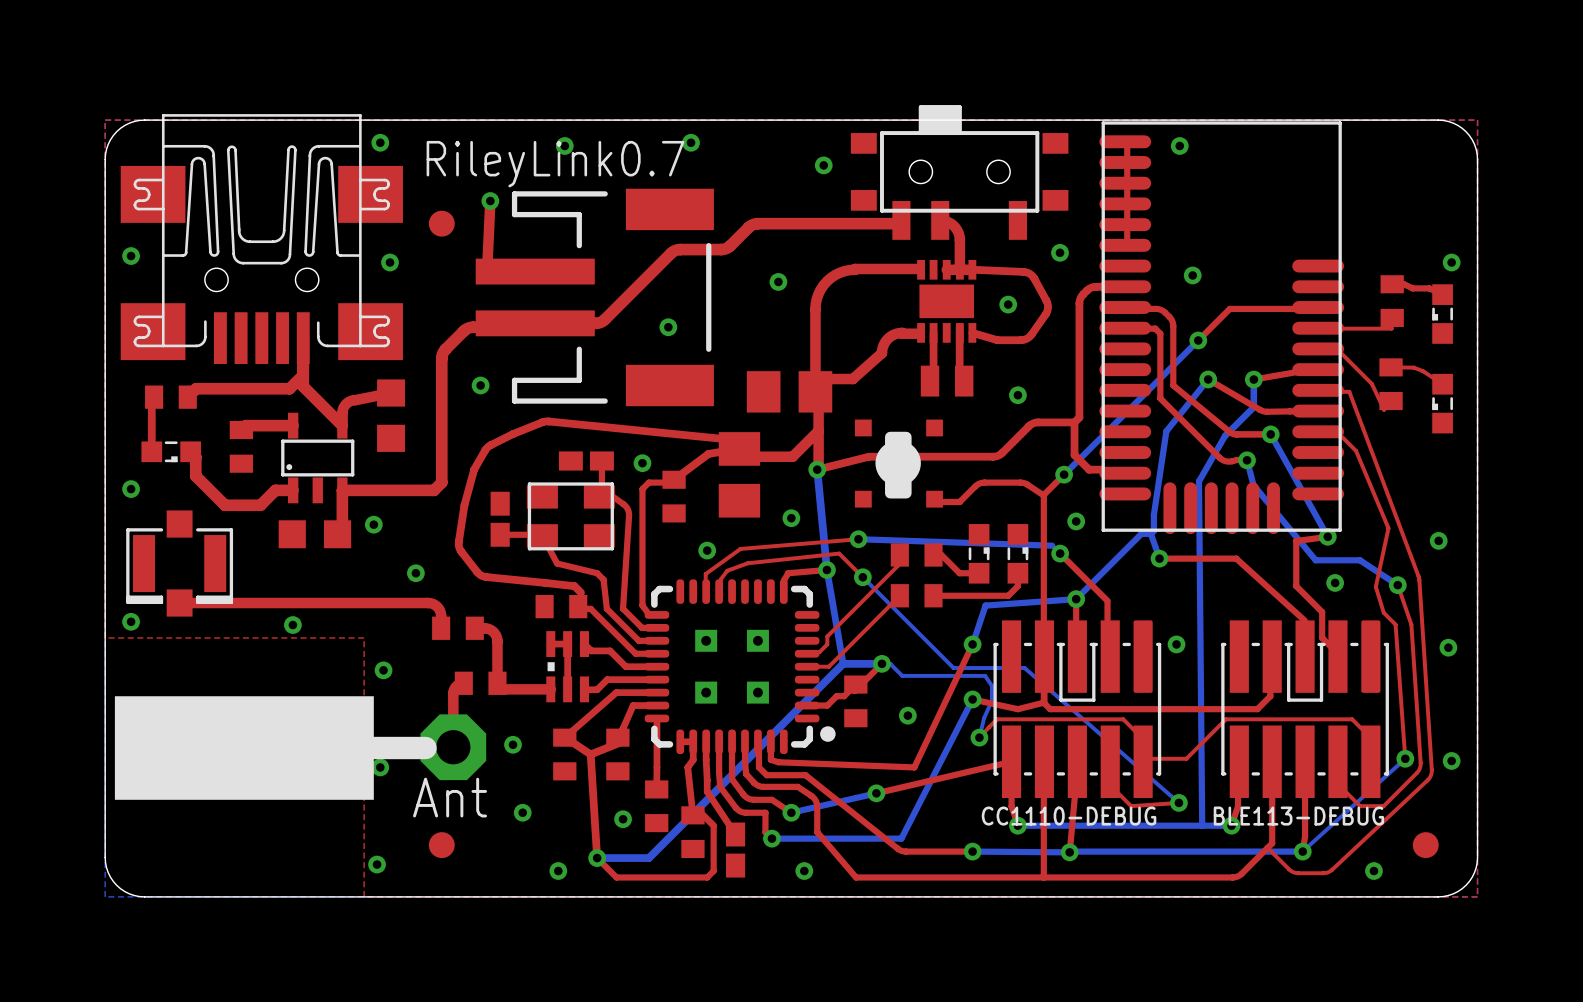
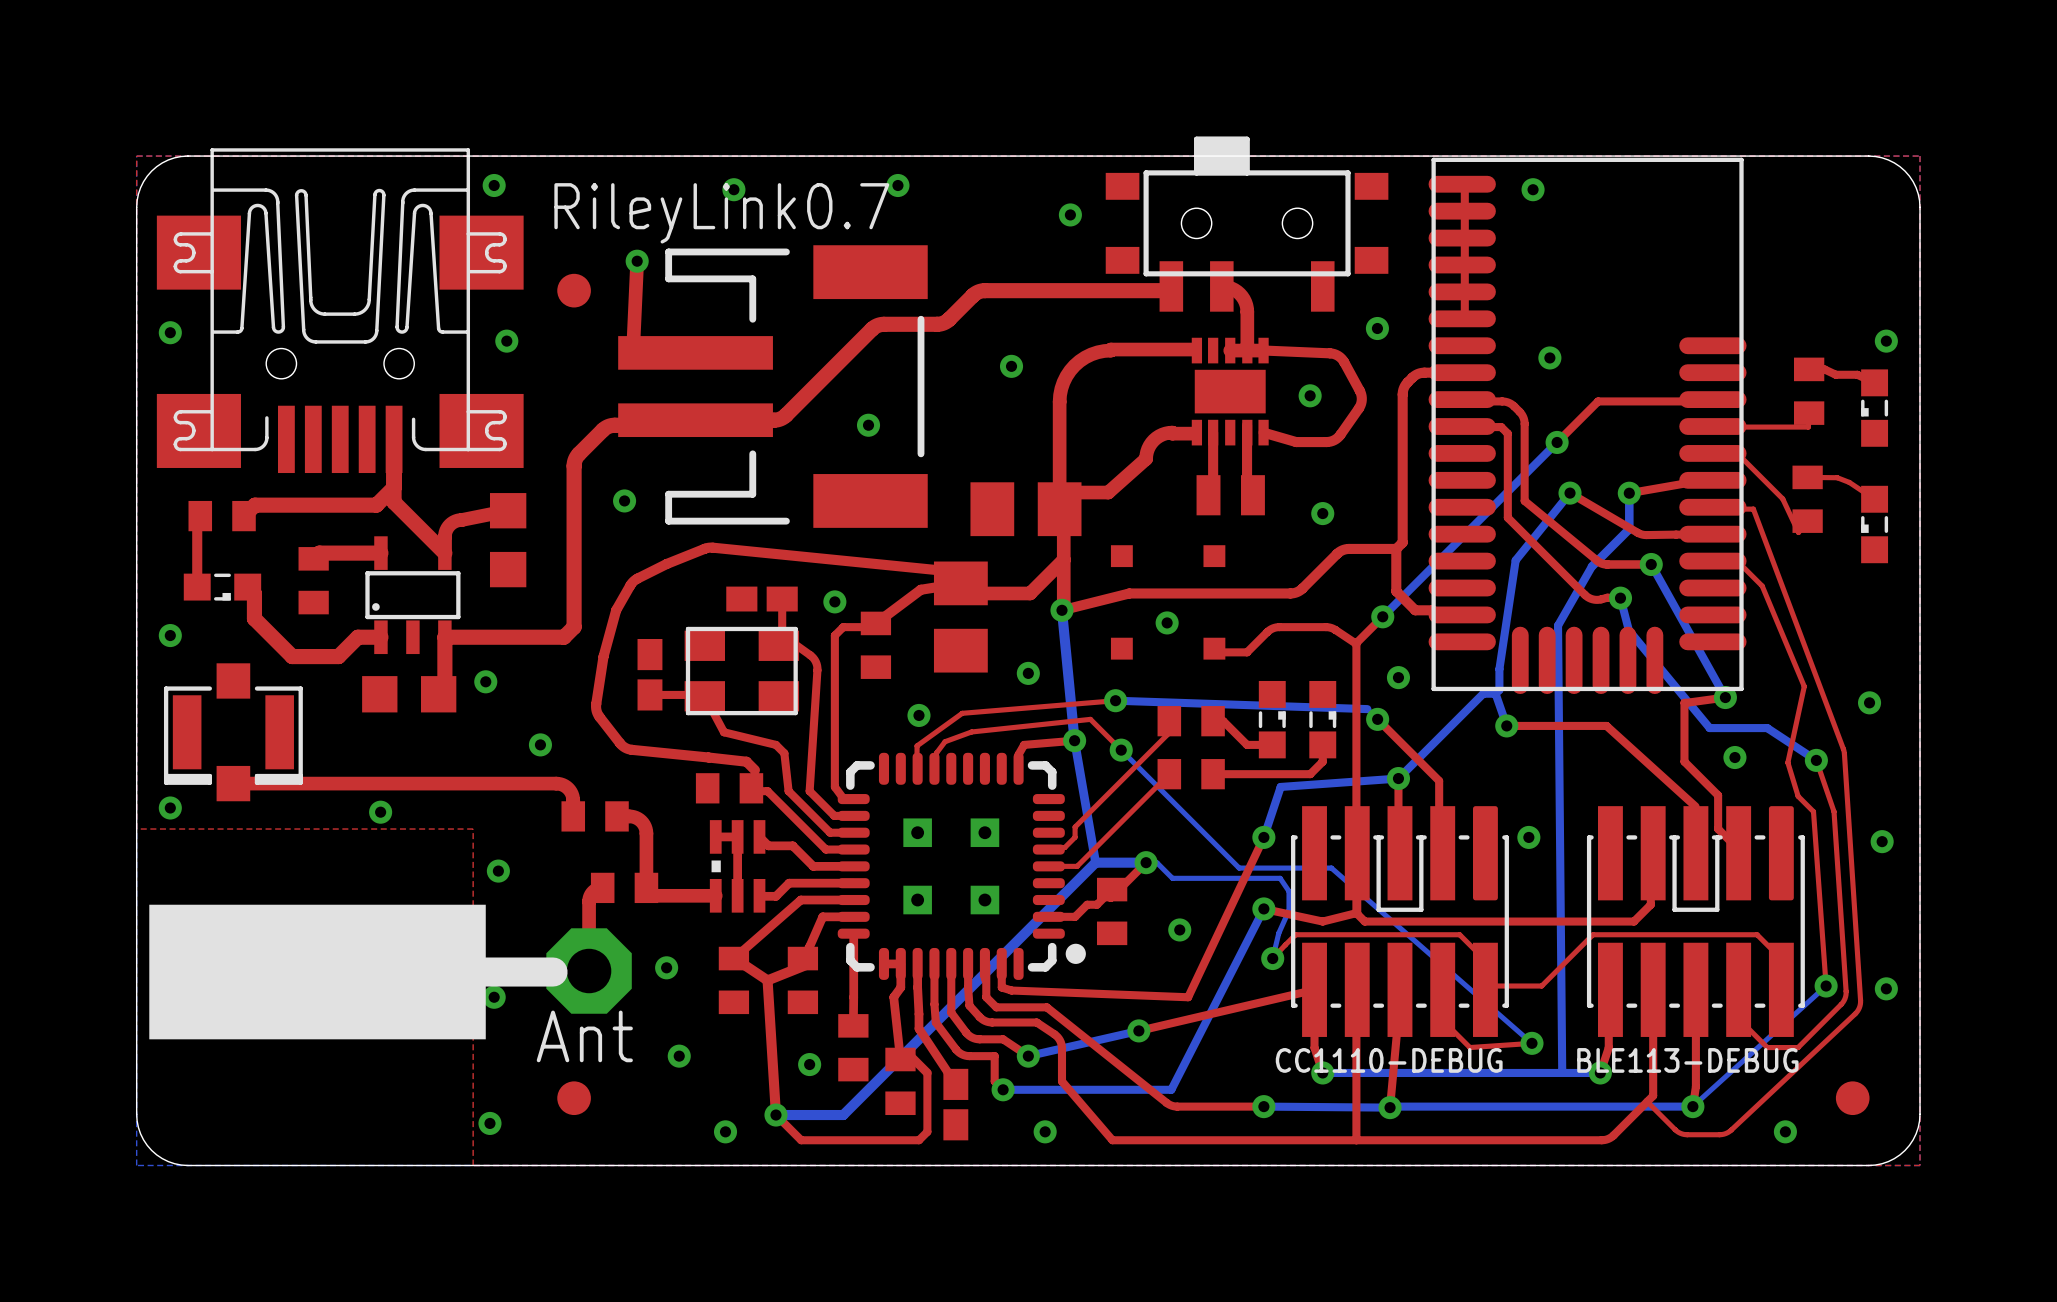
drawing: [875, 431, 921, 499] -> none

